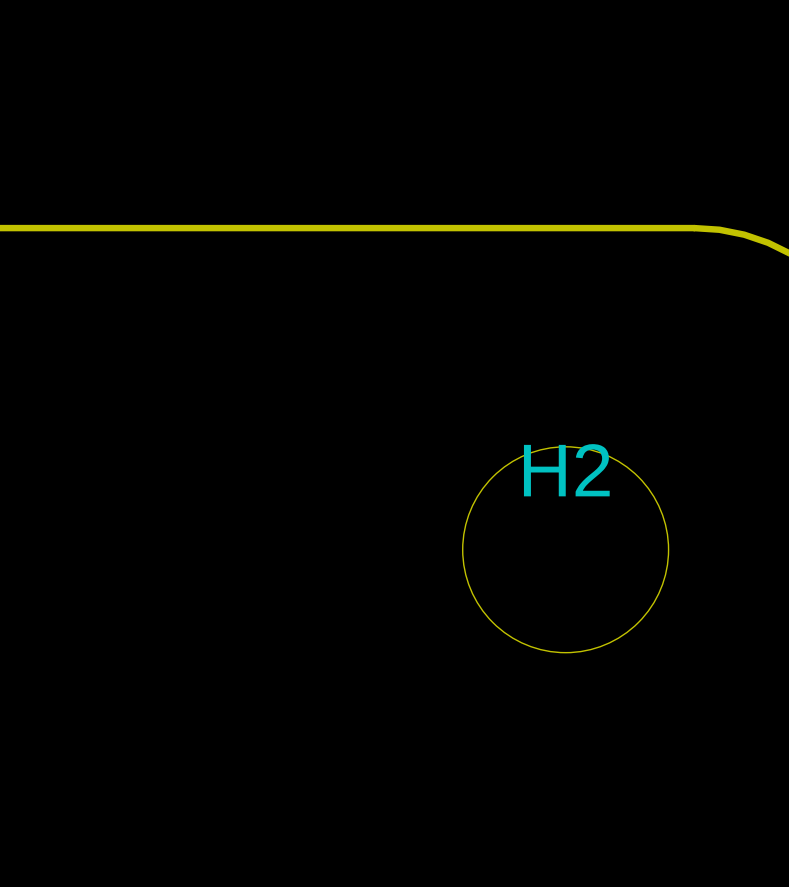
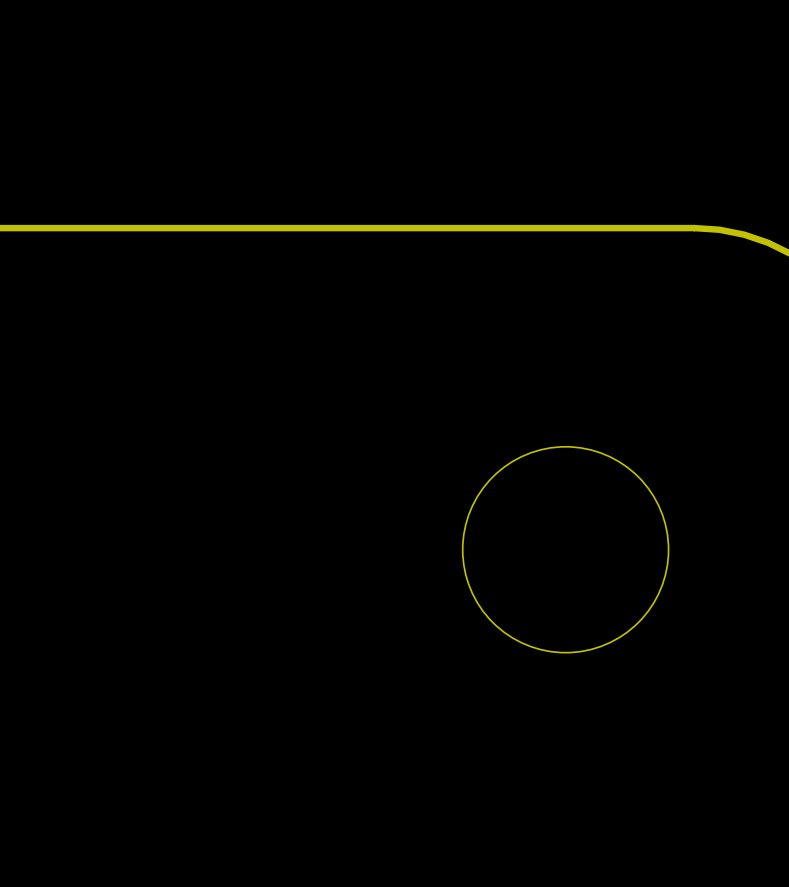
H2 name: H2 (566, 470) -> none

